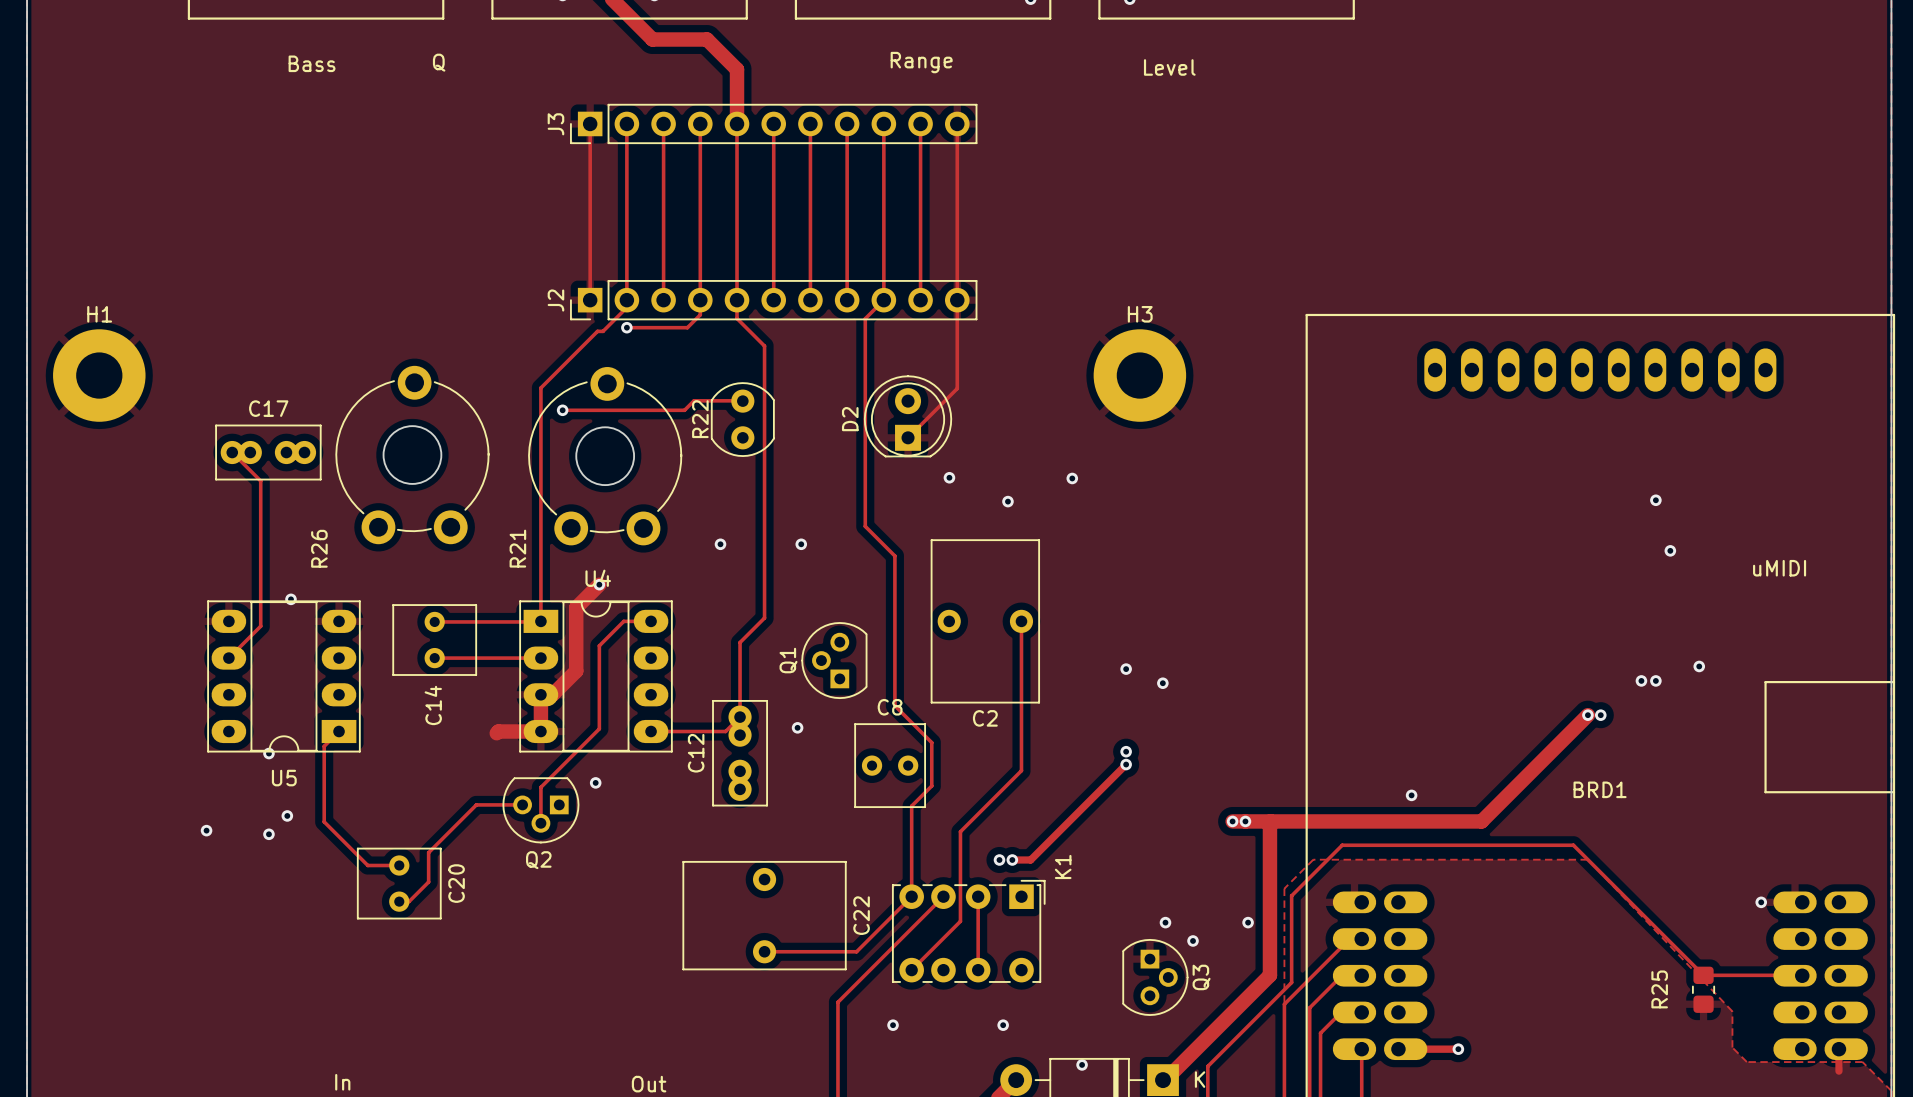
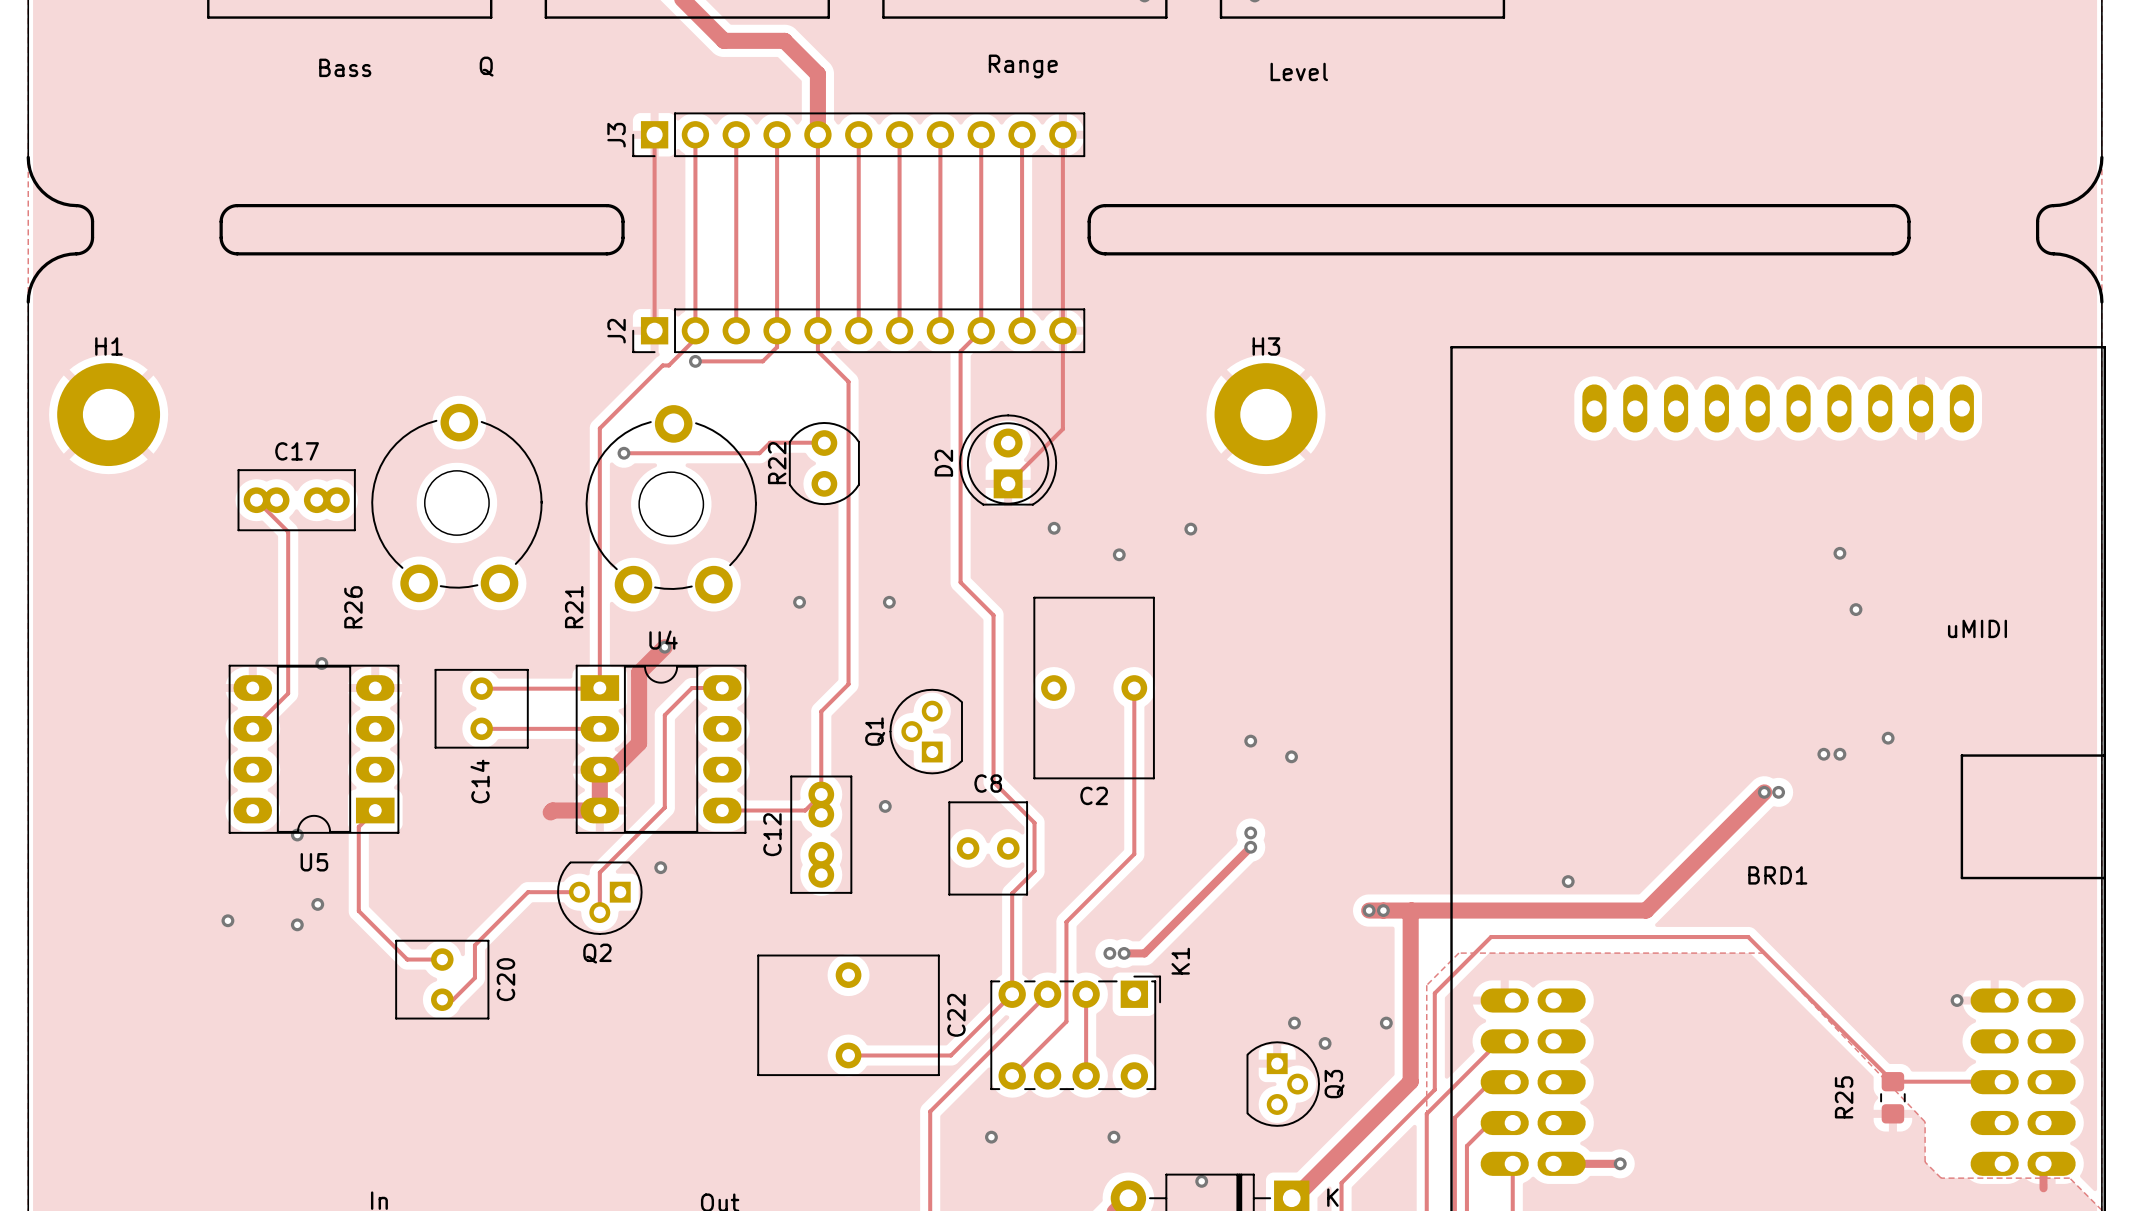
board edge: (27, 144) (27, 274) -> (28, 157) (31, 175) (42, 191) (58, 201) (85, 208) (90, 213) (92, 221) (92, 239) (89, 247) (81, 252) (58, 257) (42, 267) (31, 283) (28, 302)
board edge: (1891, 144) (1891, 274) -> (2101, 157) (2098, 175) (2087, 191) (2072, 201) (2045, 208) (2040, 213) (2037, 221) (2037, 239) (2041, 247) (2048, 252) (2072, 257) (2087, 267) (2098, 283) (2101, 302)
board edge: none -> (237, 205) (608, 205) (615, 208) (621, 214) (622, 239) (616, 250) (606, 253) (235, 253) (228, 251) (222, 244) (221, 221) (225, 210) (237, 205)
board edge: none -> (1105, 205) (1892, 205) (1901, 208) (1907, 214) (1909, 237) (1904, 249) (1892, 253) (1105, 253) (1093, 249) (1089, 237) (1090, 214) (1096, 208) (1105, 205)

